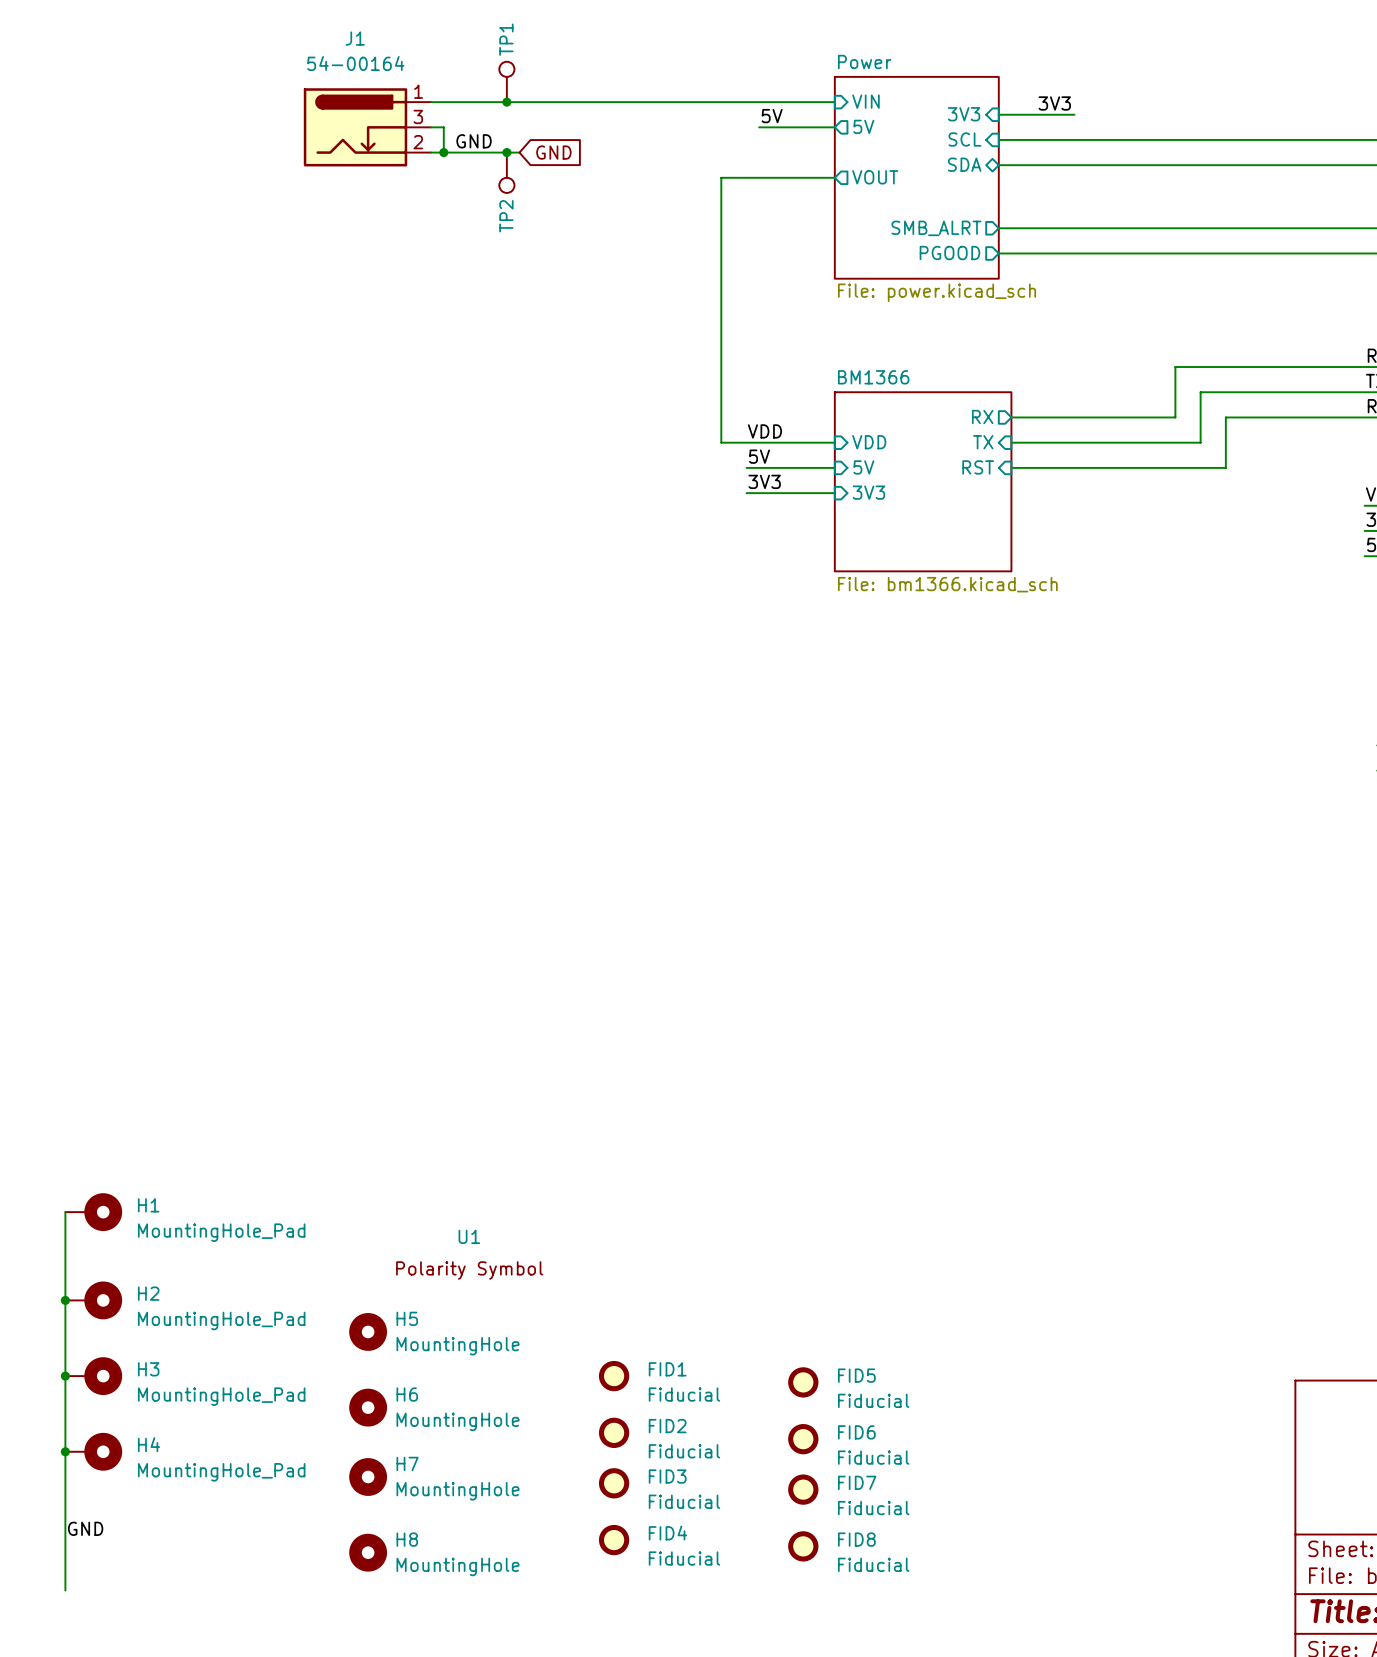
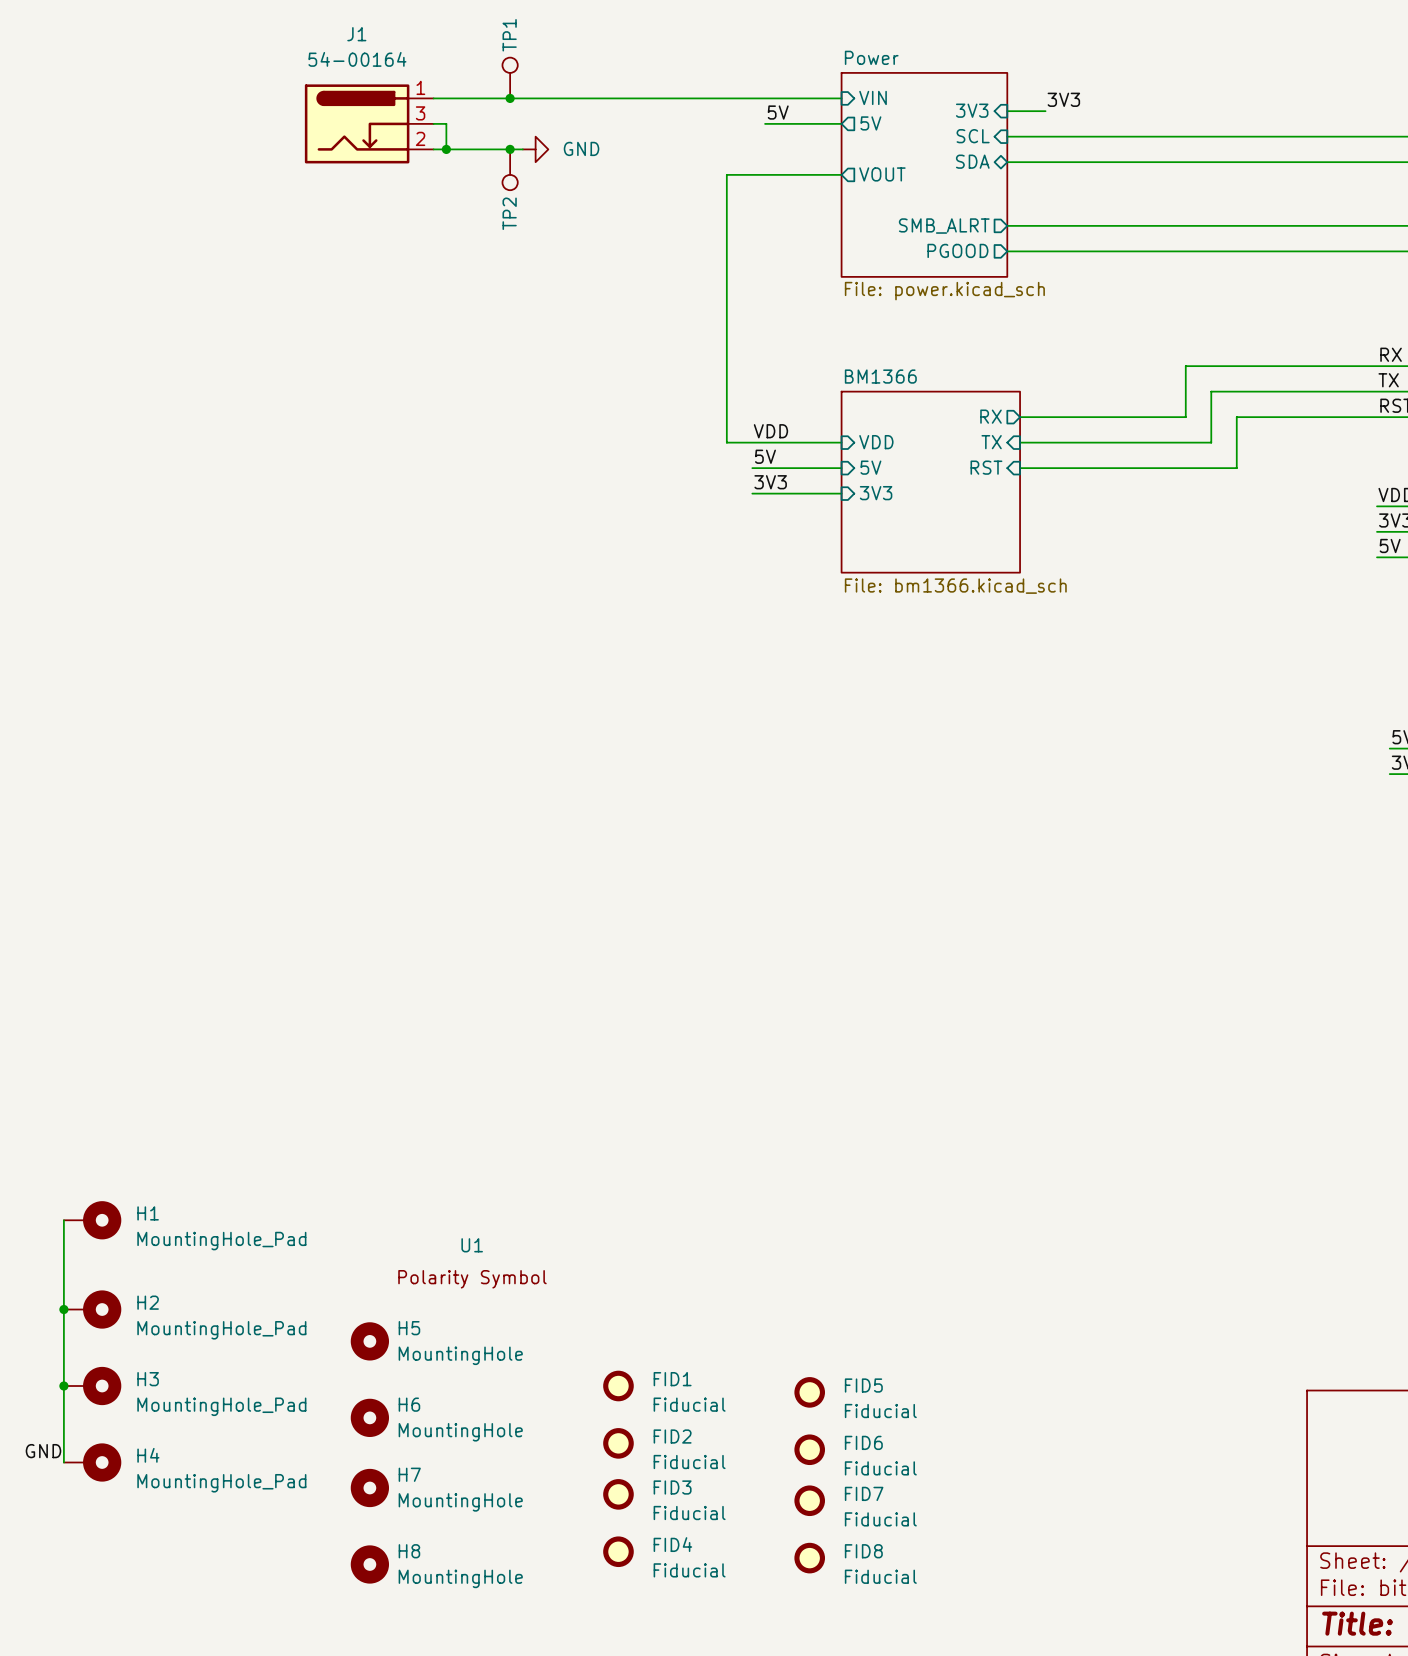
wire: (1036, 114) (1074, 114) -> none
label: GND (474, 141) -> none
power symbol: none -> GND (535, 149)
global label: GND (553, 152) -> none
wire: (65, 1451) (65, 1590) -> none
junction: (65, 1451) -> none
label position: GND (85, 1528) -> GND (43, 1451)

